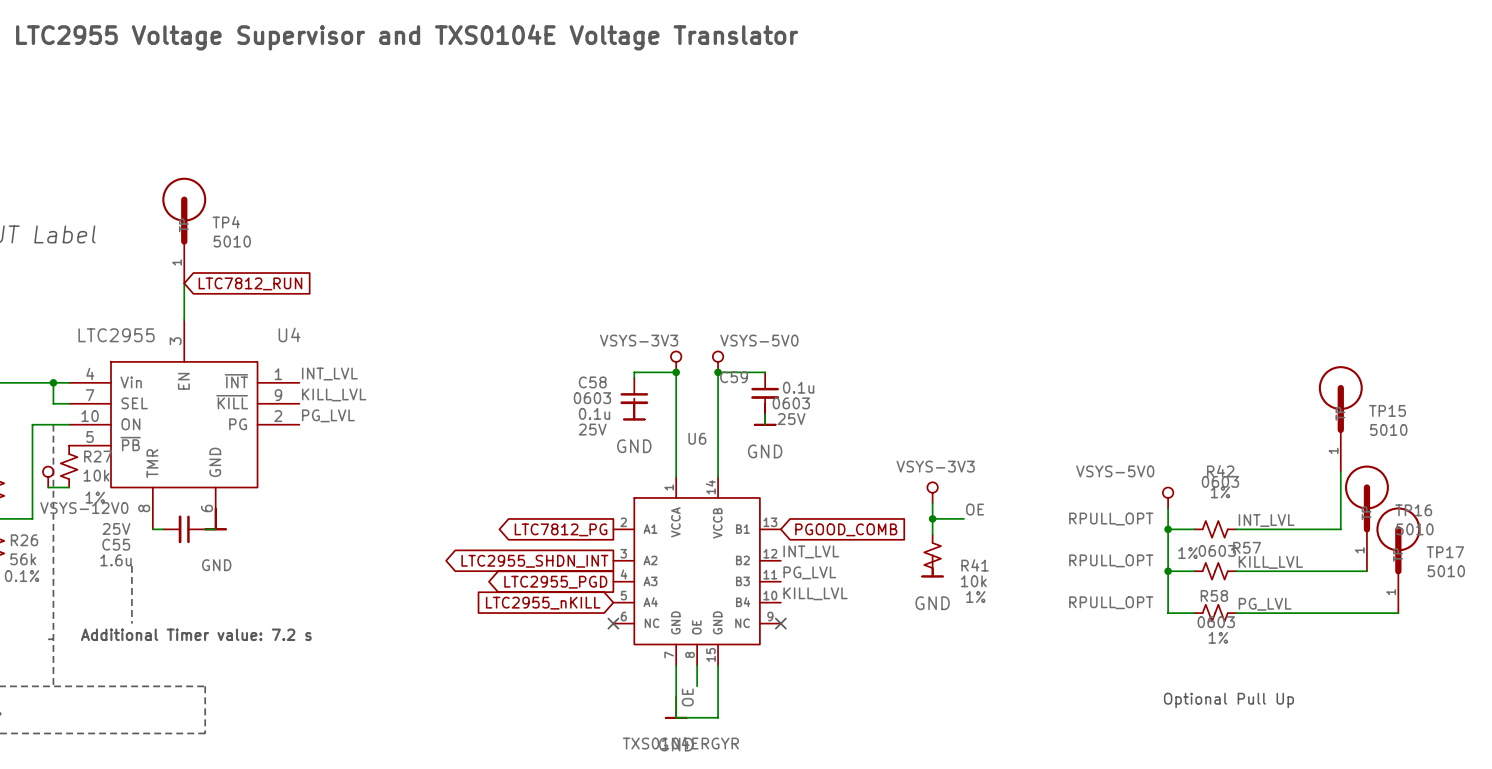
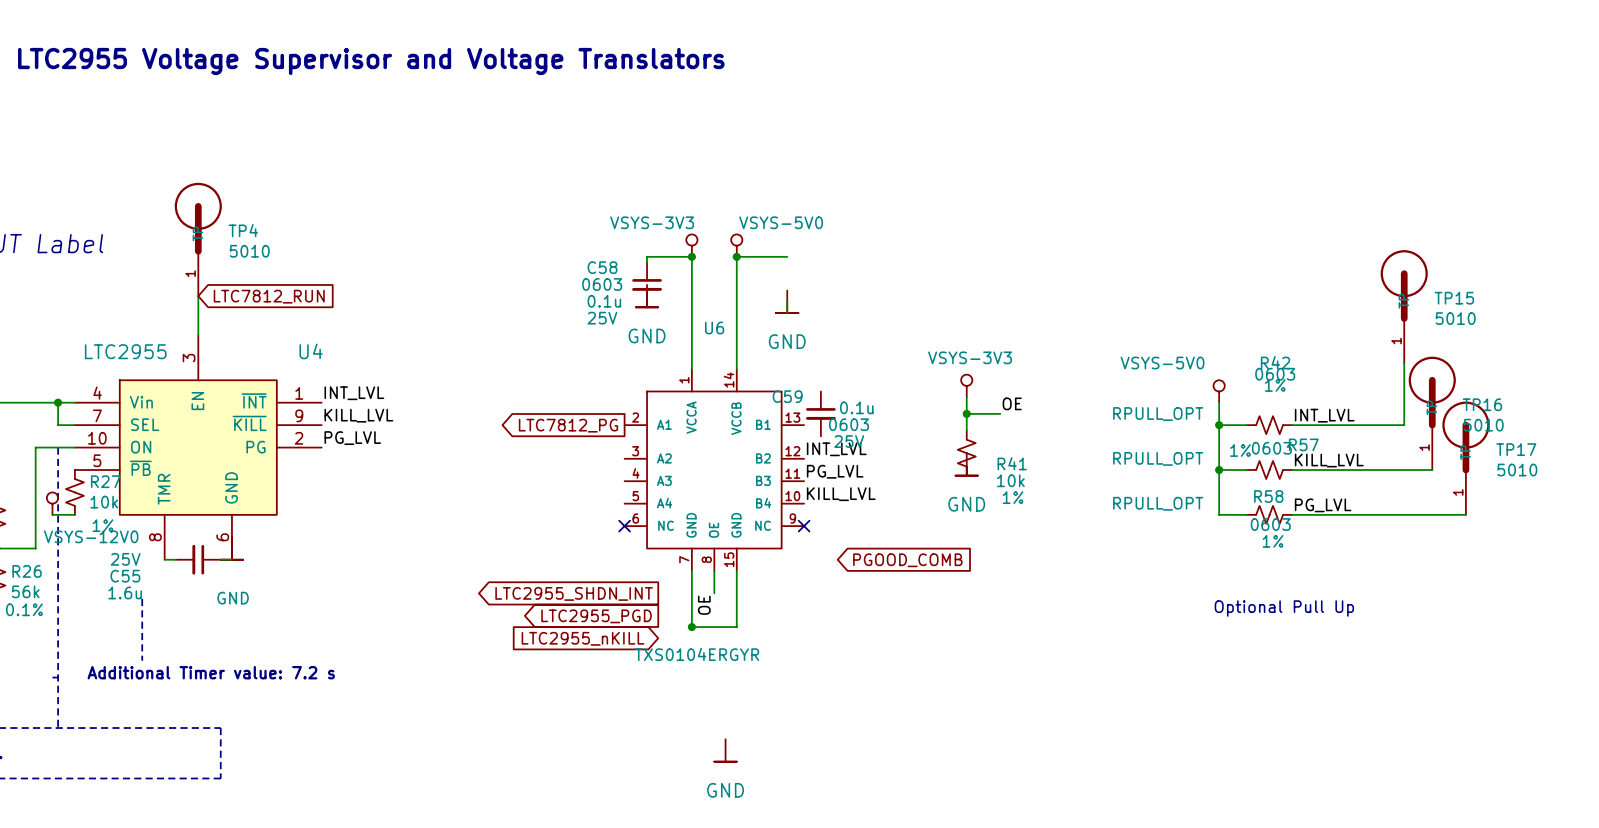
text: LTC2955 Voltage Supervisor and TXS0104E Voltage Translator (407, 37) -> LTC2955 Voltage Supervisor and Voltage Translators (371, 61)
power symbol: none -> VSYS-3V3 (691, 245)
junction: none -> (691, 256)
junction: none -> (736, 256)
power symbol: none -> GND (647, 296)
power symbol: none -> GND (787, 301)
power symbol: VSYS-3V3 (676, 361) -> none
power symbol position: VSYS-5V0 (718, 361) -> VSYS-5V0 (736, 245)
power symbol: none -> VSYS-3V3 (966, 385)
junction: (676, 372) -> none
junction: (718, 372) -> none
wire: (765, 372) (718, 372) (718, 477) -> (787, 256) (736, 256) (736, 369)
wire: (634, 377) (634, 372) (676, 372) (676, 477) -> (647, 262) (647, 256) (691, 256) (691, 369)
junction: none -> (966, 413)
C58 position: (634, 398) -> (647, 284)
junction: none -> (1219, 425)
power symbol: GND (634, 409) -> none
wire: (765, 414) (765, 424) -> (787, 301) (787, 312)
power symbol: GND (765, 414) -> none
TP15 position: (1340, 418) -> (1404, 306)
power symbol: none -> GND (966, 464)
junction: none -> (1219, 470)
wire: (1340, 471) (1340, 529) (1236, 529) -> (1404, 363) (1404, 425) (1292, 425)
power symbol: VSYS-3V3 (932, 492) -> none
no-connect mark: none -> (624, 526)
no-connect mark: none -> (804, 526)
power symbol position: VSYS-5V0 (1168, 497) -> VSYS-5V0 (1219, 391)
wire: (932, 503) (932, 534) -> (966, 397) (966, 430)
wire: (1168, 508) (1168, 613) (1194, 613) -> (1219, 402) (1219, 514) (1247, 514)
label position: OE (975, 509) -> OE (1012, 403)
wire: (932, 518) (964, 518) -> (966, 413) (1000, 413)
junction: (932, 518) -> none
TP16 position: (1366, 518) -> (1432, 413)
label position: INT_LVL (1266, 520) -> INT_LVL (1324, 415)
global label position: LTC7812_PG (561, 529) -> LTC7812_PG (568, 425)
wire: (1168, 529) (1194, 529) -> (1219, 425) (1247, 425)
junction: (1168, 529) -> none
R42 position: (1215, 529) -> (1269, 425)
label position: INT_LVL (811, 551) -> INT_LVL (836, 449)
R41 position: (932, 555) -> (966, 453)
TP17 position: (1398, 560) -> (1465, 458)
label position: KILL_LVL (1270, 562) -> KILL_LVL (1329, 460)
power symbol: GND (932, 566) -> none
U6 position: (697, 571) -> (714, 470)
wire: (1168, 571) (1194, 571) -> (1219, 470) (1247, 470)
junction: (1168, 571) -> none
R57 position: (1215, 571) -> (1269, 470)
wire: (1236, 571) (1366, 571) -> (1292, 470) (1432, 470)
label position: PG_LVL (809, 572) -> PG_LVL (835, 471)
junction: none -> (691, 627)
label position: KILL_LVL (815, 593) -> KILL_LVL (841, 494)
label position: PG_LVL (1265, 604) -> PG_LVL (1323, 505)
R58 position: (1215, 613) -> (1269, 514)
wire: (1236, 613) (1398, 613) -> (1292, 514) (1465, 514)
no-connect mark: (613, 623) -> none
no-connect mark: (780, 623) -> none
wire: (676, 665) (676, 717) (718, 717) (718, 665) -> (691, 570) (691, 627) (736, 627) (736, 570)
wire: (697, 665) (697, 686) -> (714, 570) (714, 593)
label position: OE (687, 697) -> OE (704, 605)
text position: Optional Pull Up (1228, 700) -> Optional Pull Up (1284, 608)

